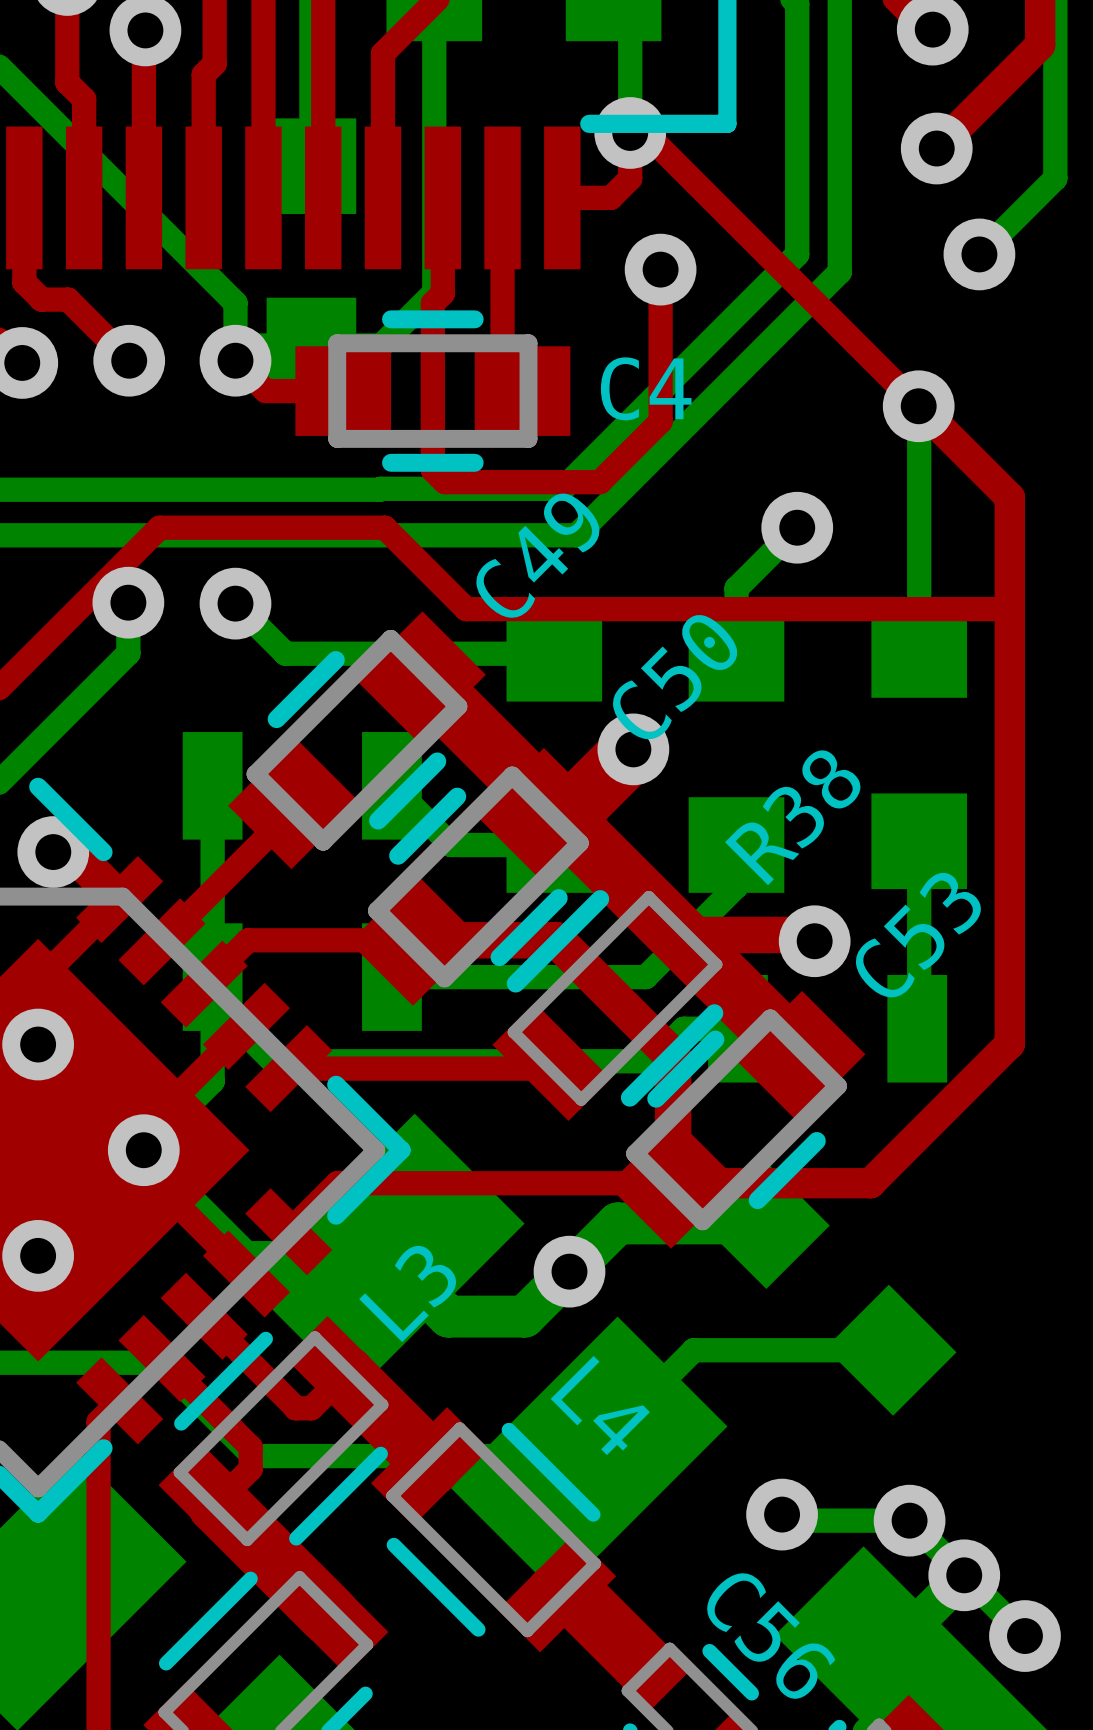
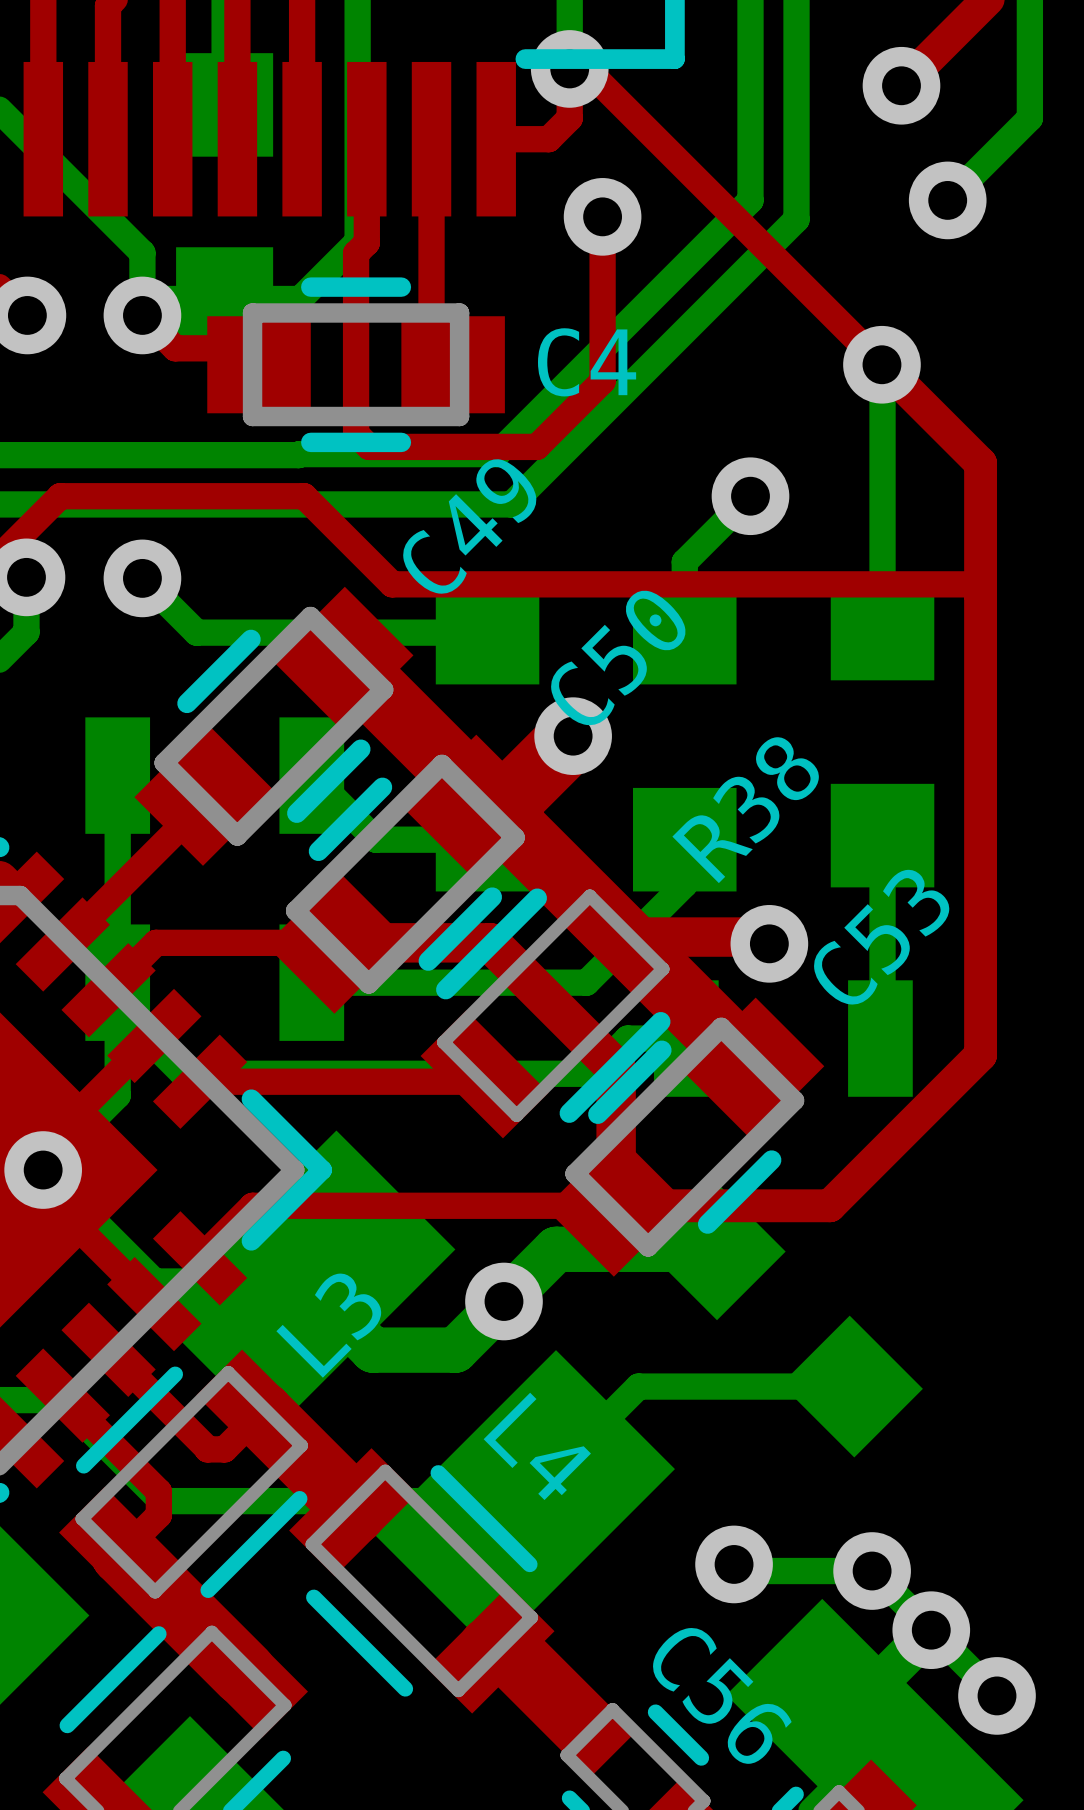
C4 position: (432, 391) -> (356, 364)

